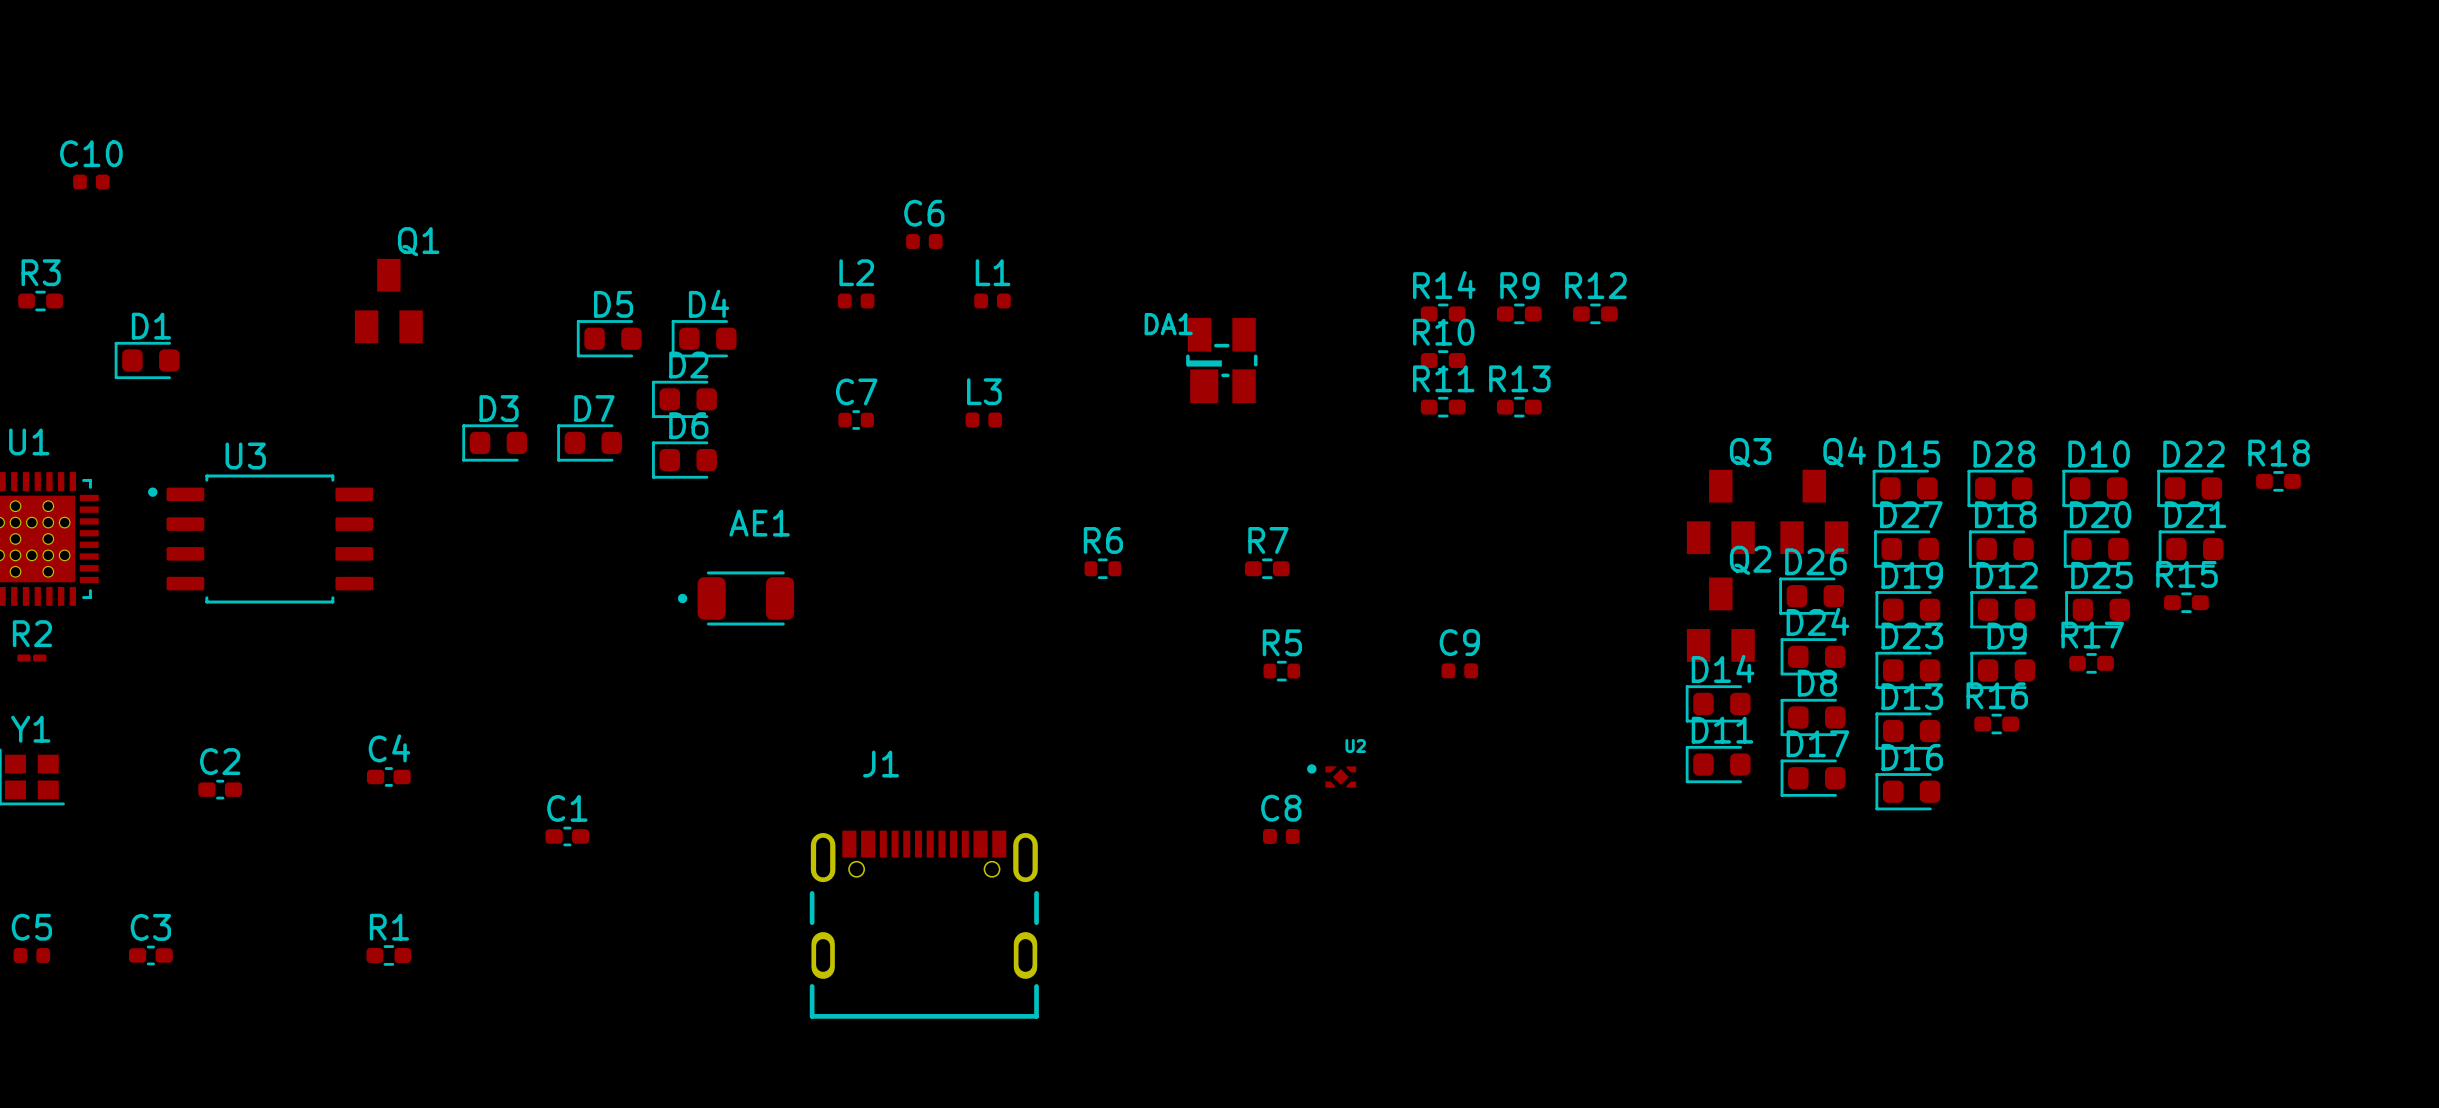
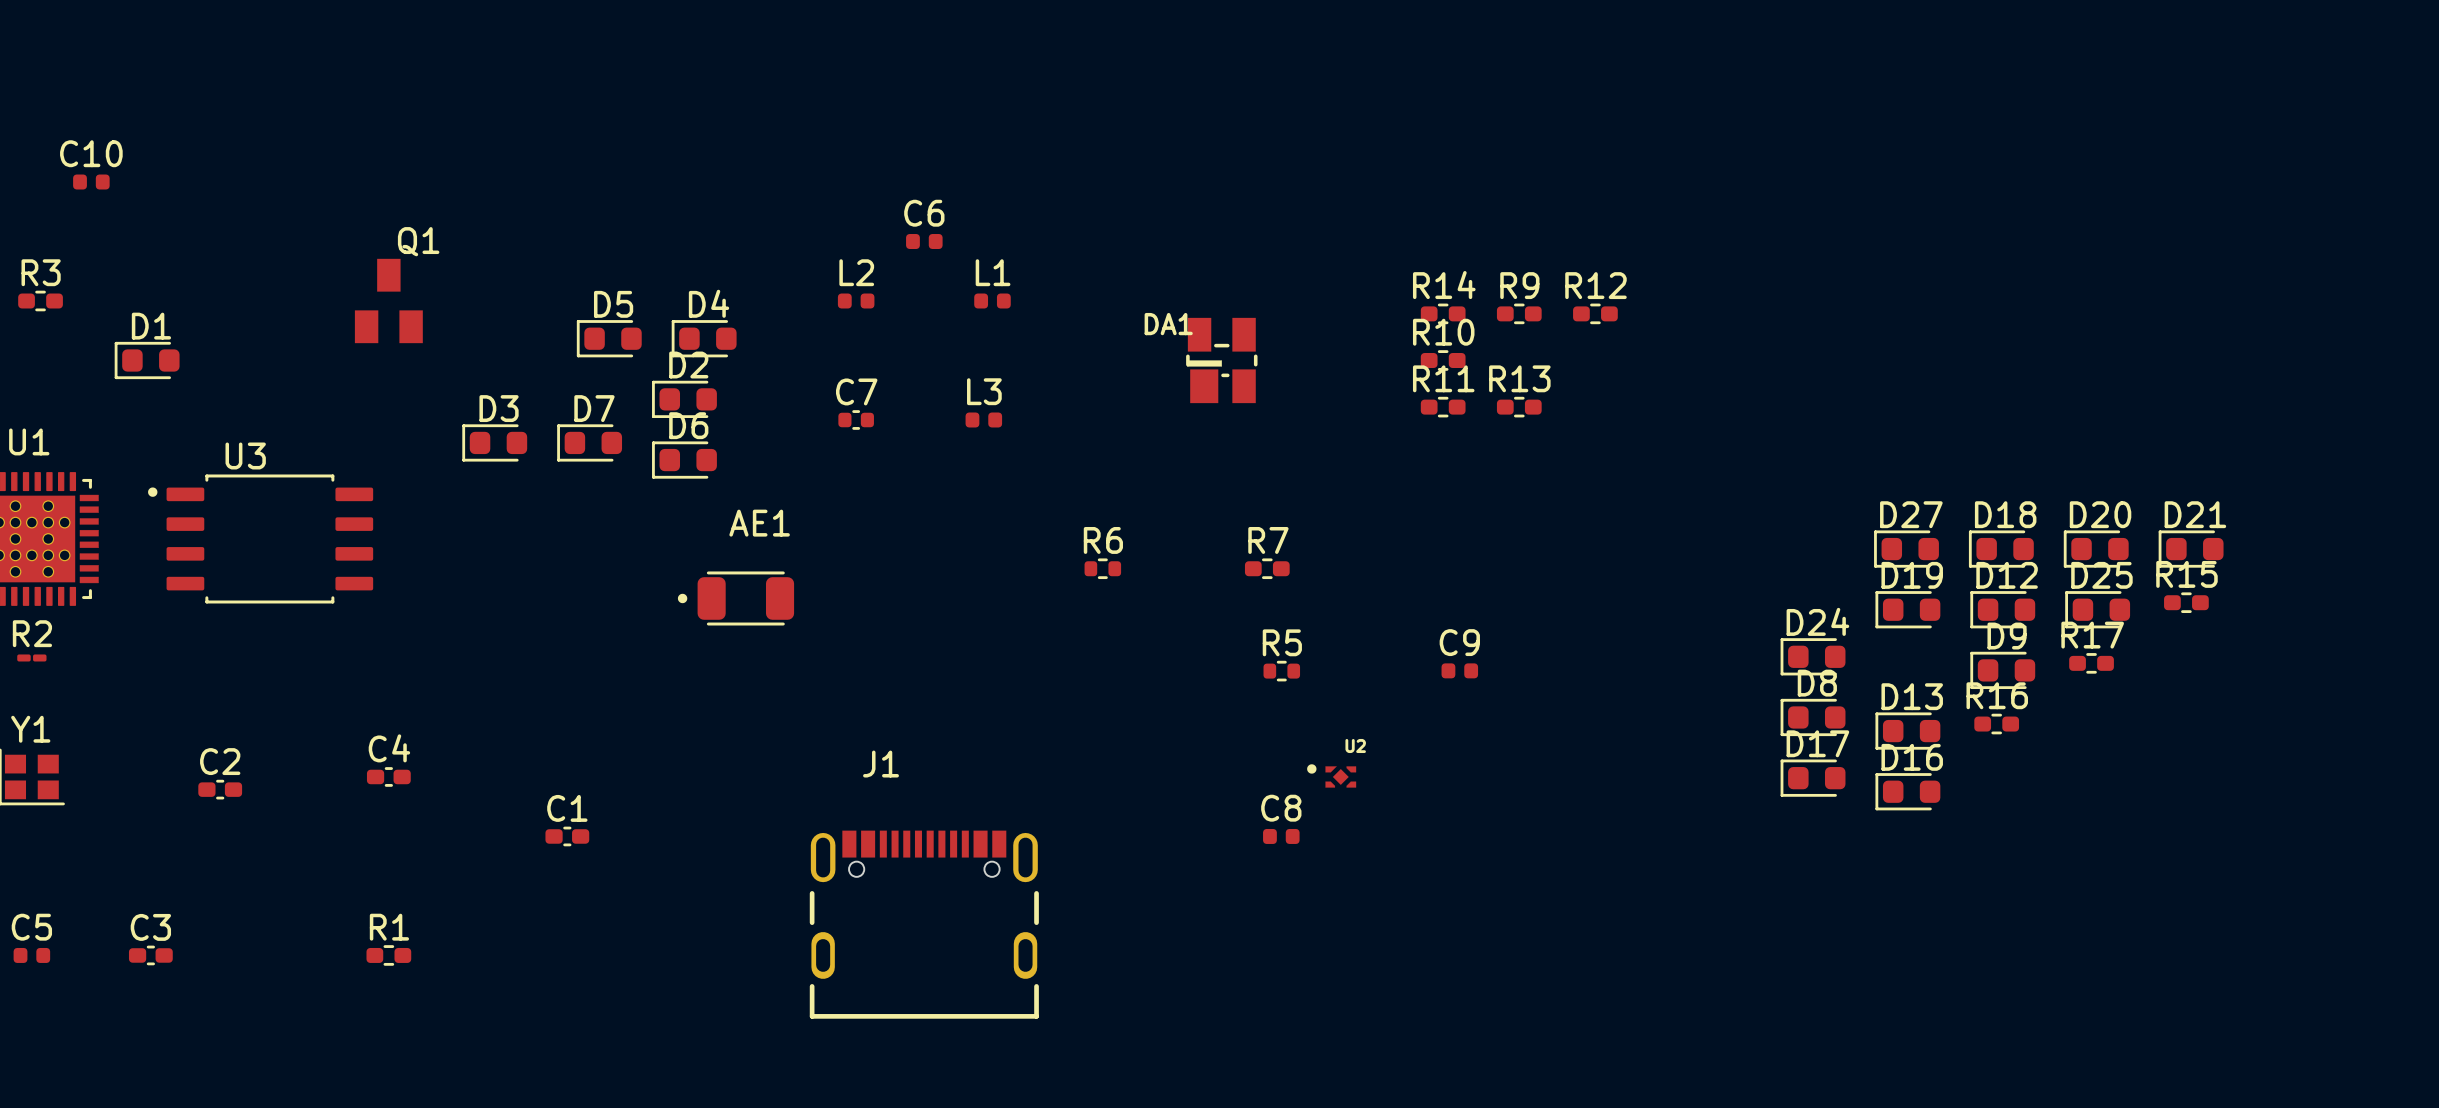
R18: (2278, 481) -> none
D15: (1905, 488) -> none
D28: (1999, 488) -> none
D10: (2094, 488) -> none
D22: (2189, 488) -> none
Q3: (1720, 511) -> none
Q4: (1814, 511) -> none
D26: (1811, 596) -> none
Q2: (1720, 619) -> none
D23: (1907, 670) -> none
D14: (1718, 703) -> none
D11: (1718, 764) -> none

